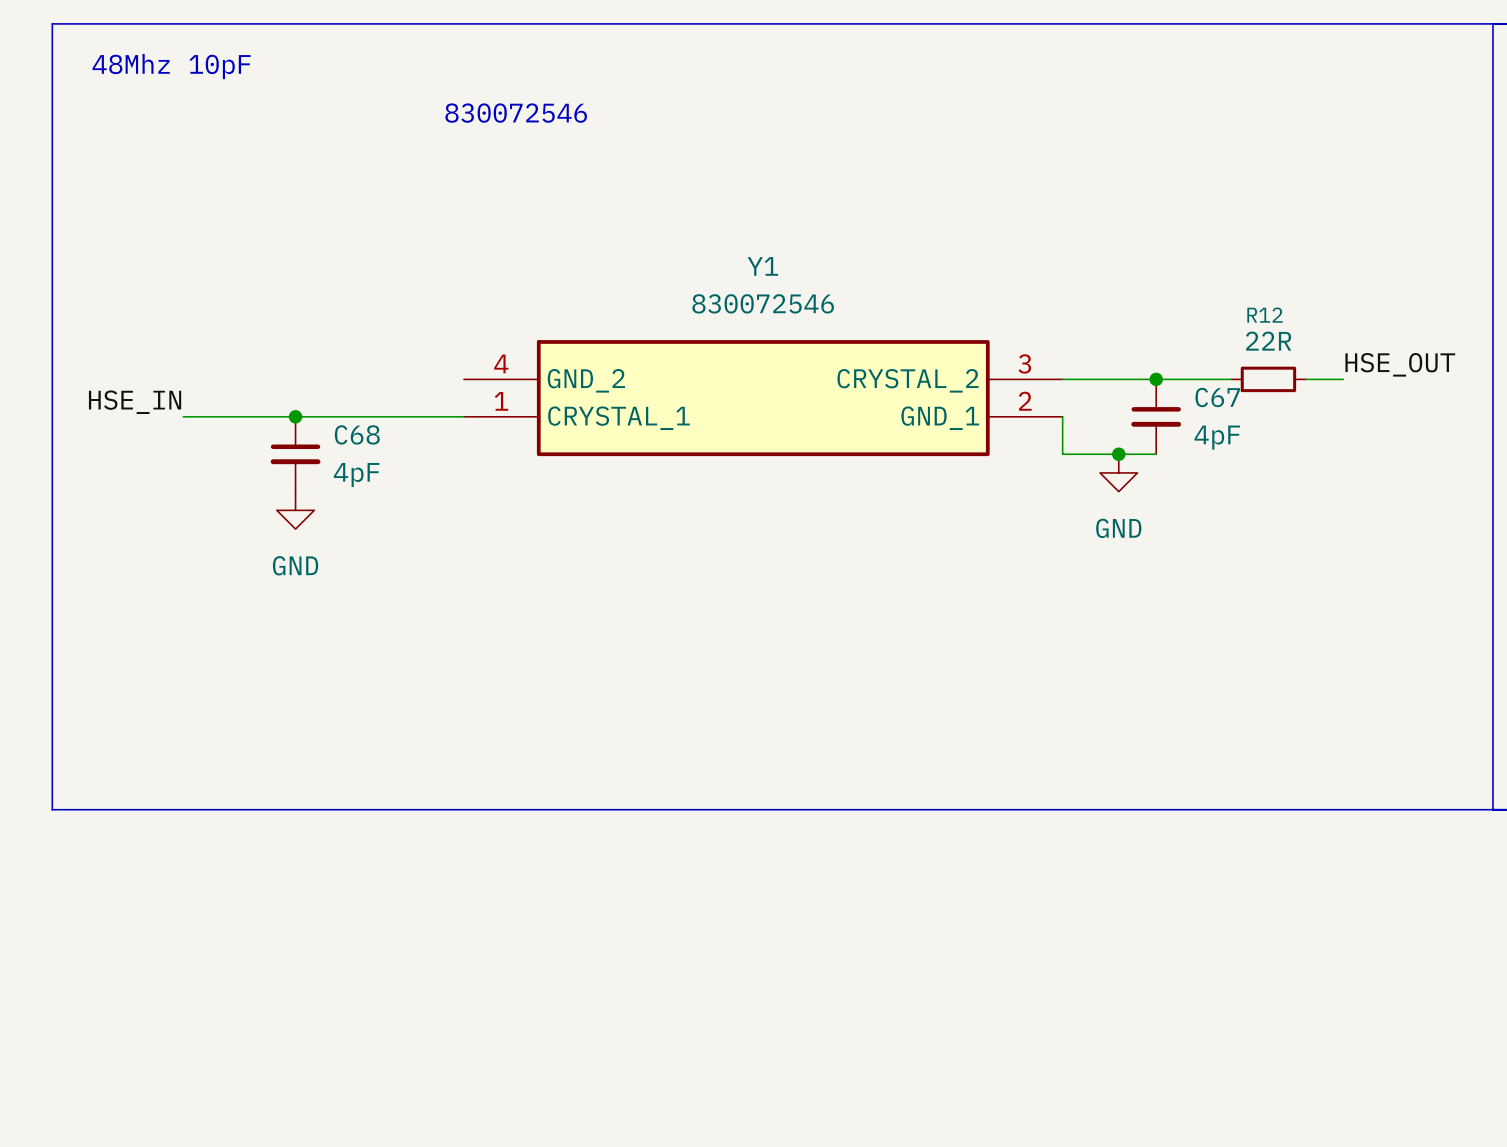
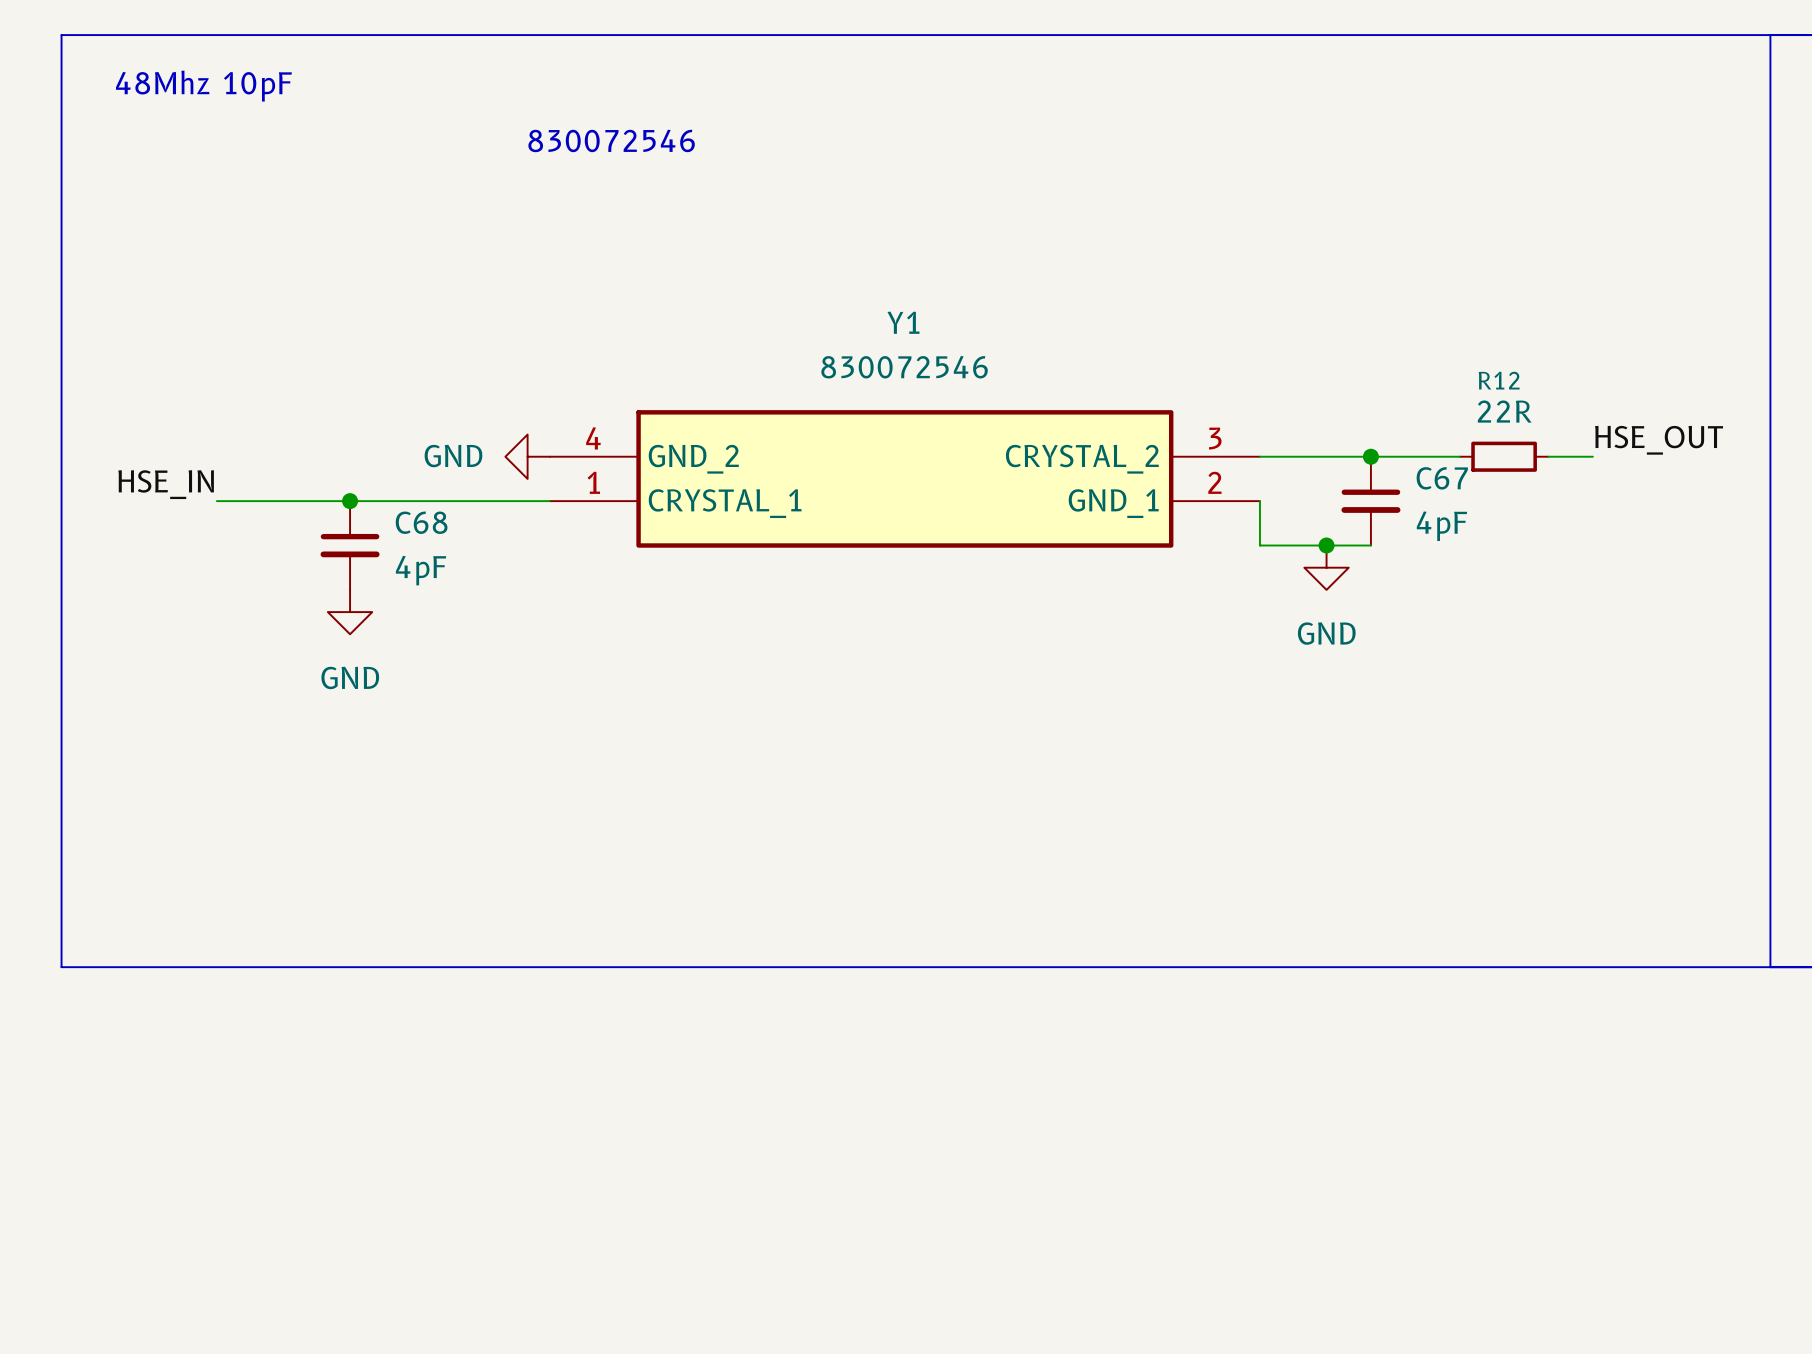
power symbol: none -> GND (527, 456)

